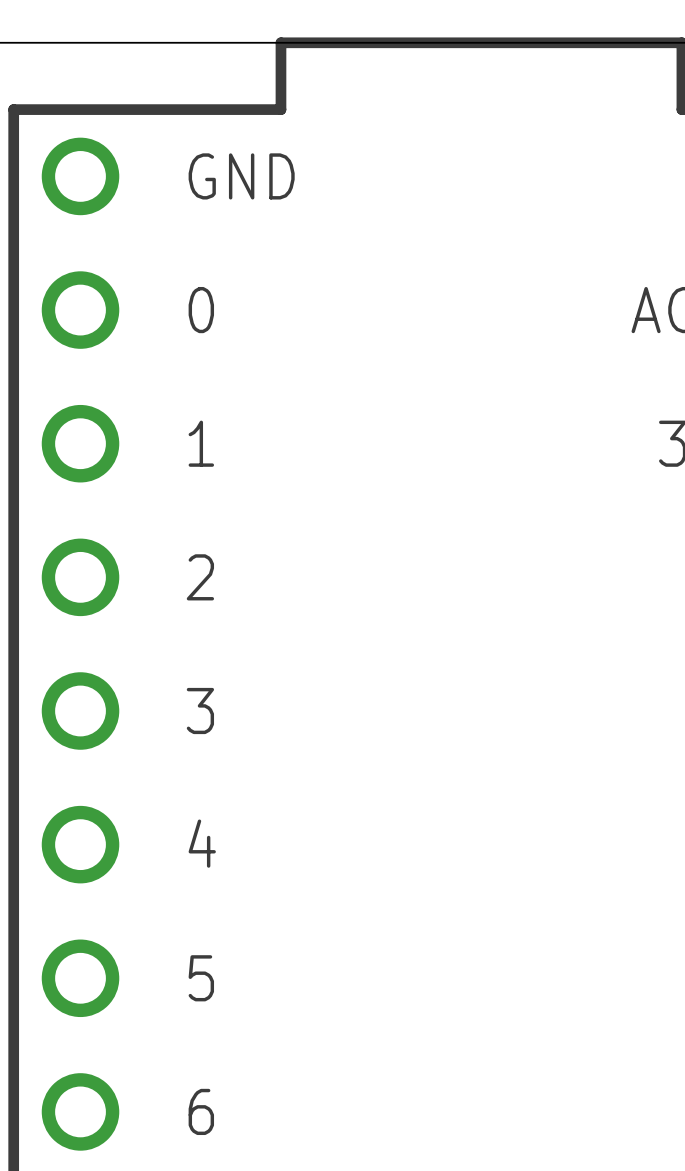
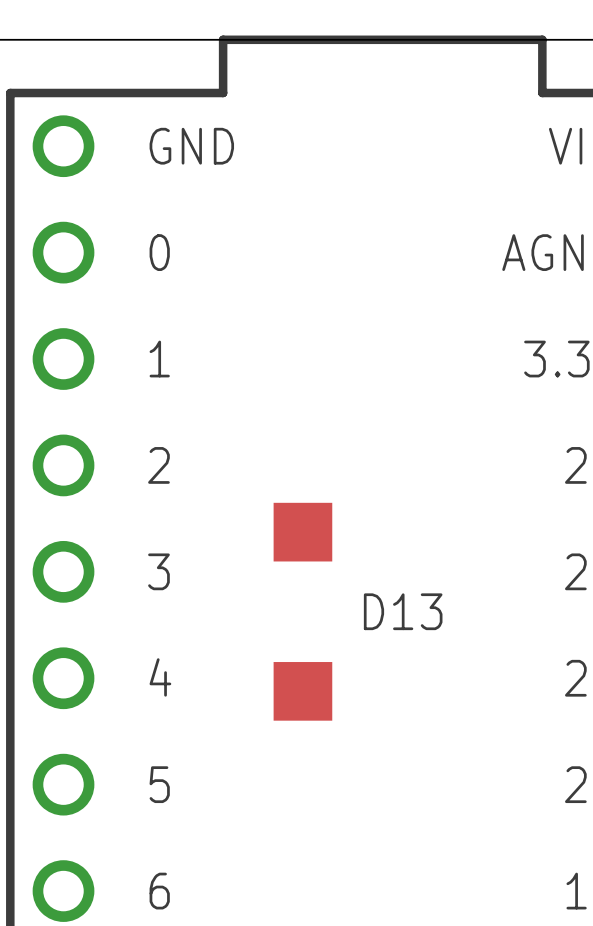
D13: none -> (302, 611)

